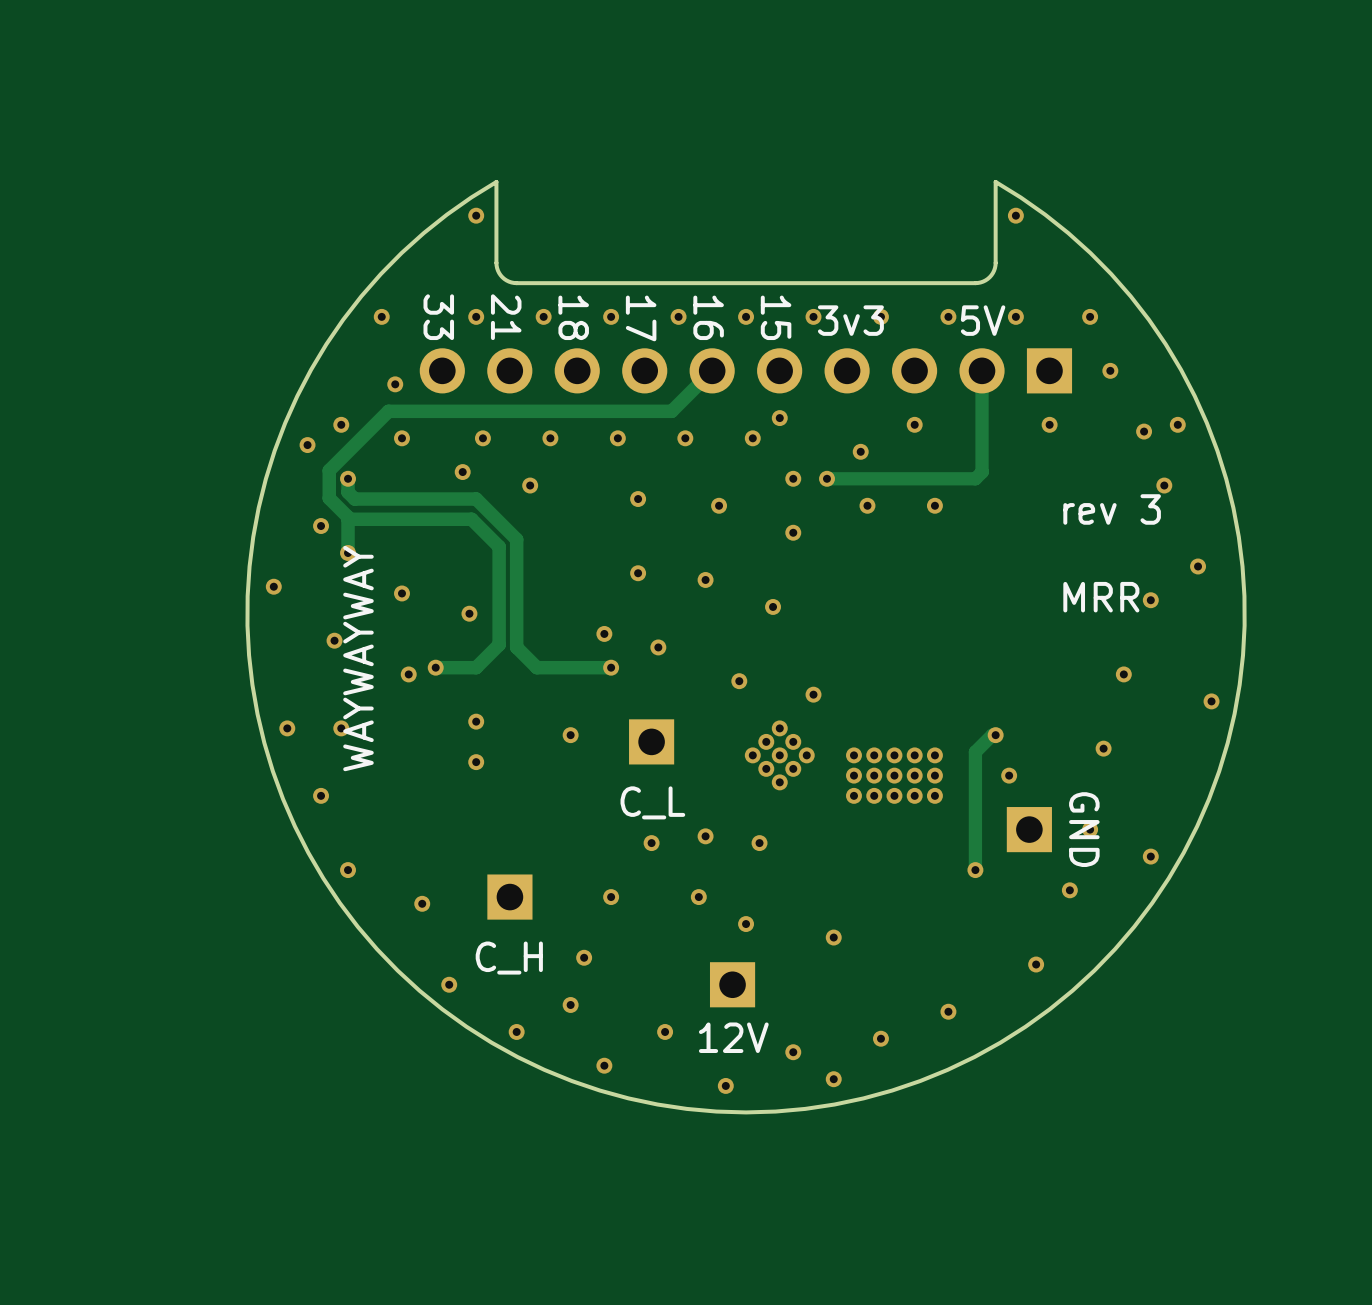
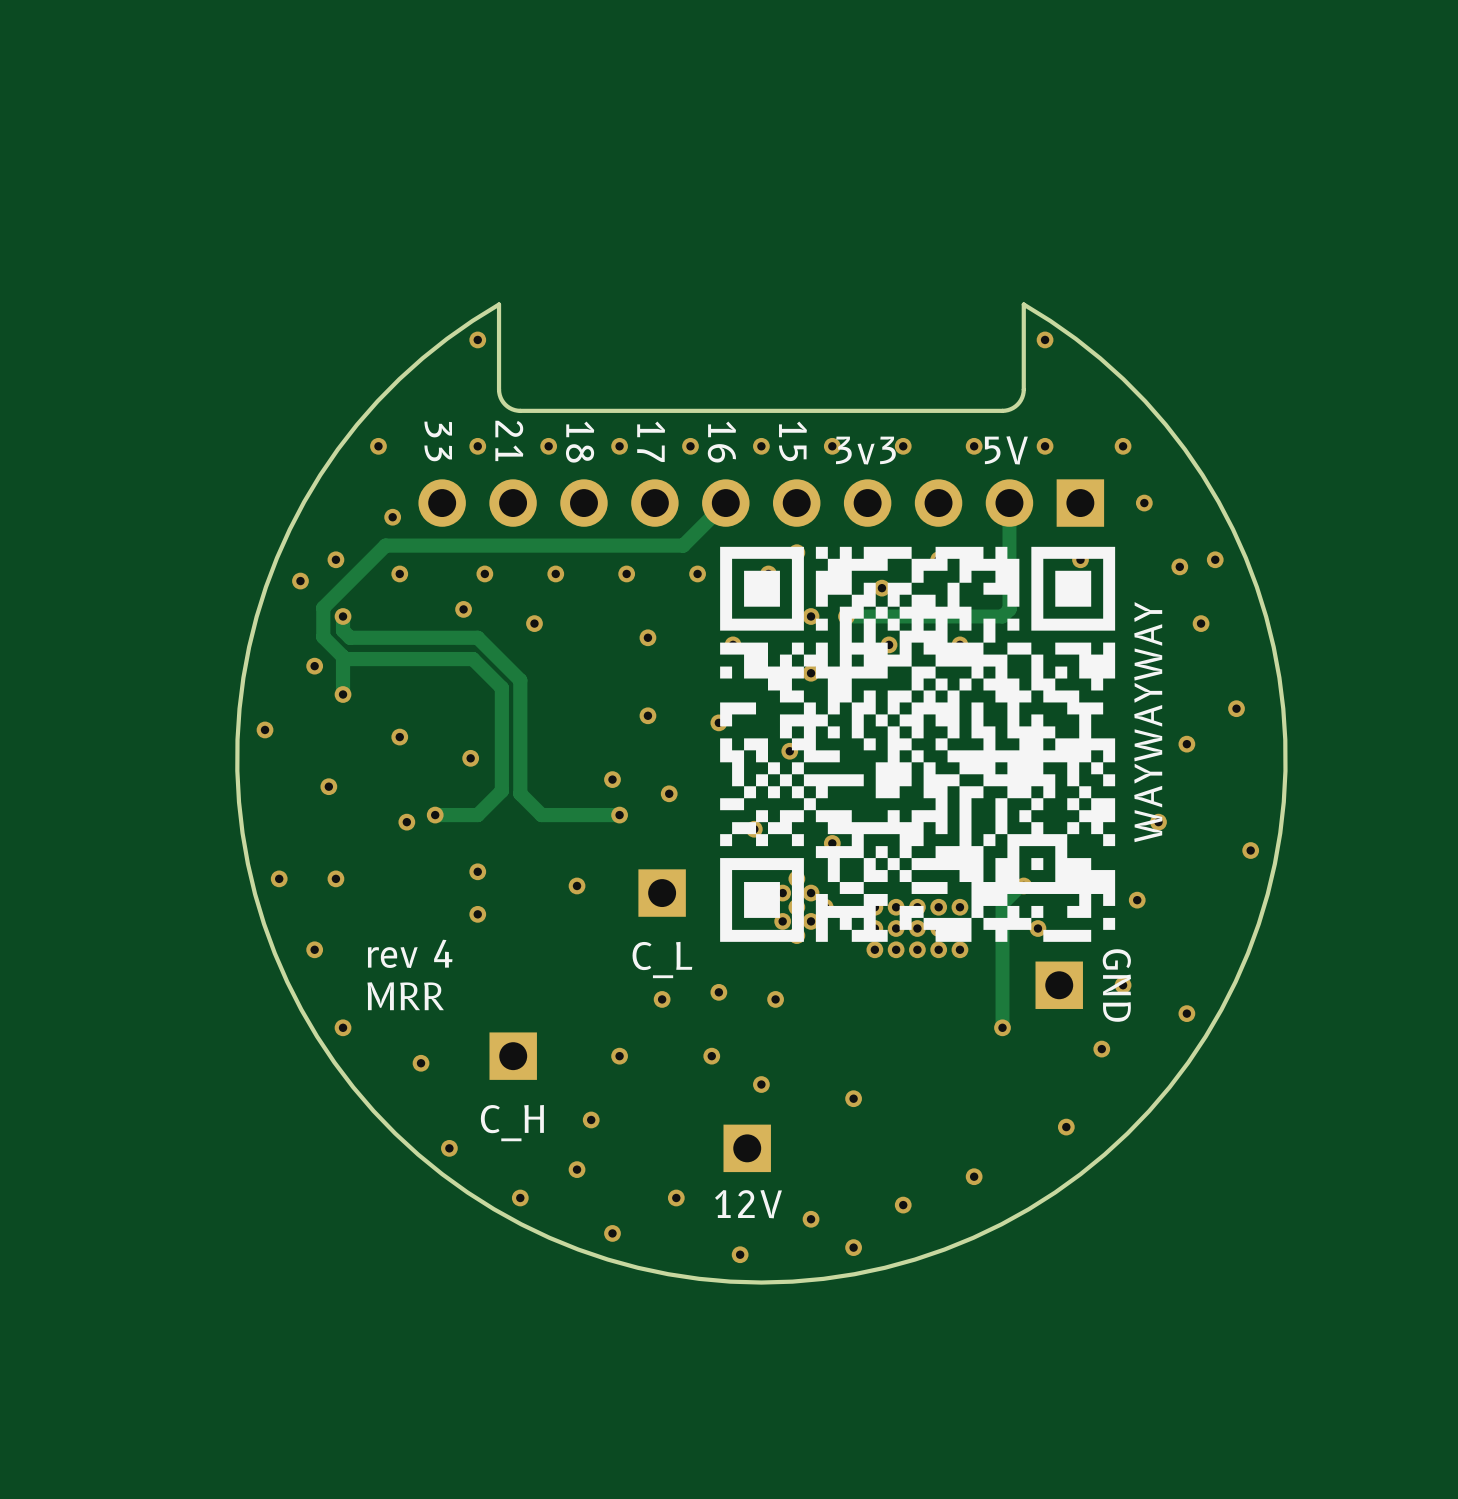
drawing: none -> [720, 546, 1116, 942]
text: rev 3 (1112, 509) -> none
text: none -> WAYWAYWAY (1148, 722)
text: MRR (1101, 597) -> none
text: WAYWAYWAY (358, 658) -> none
text: none -> rev 4 (410, 953)
text: none -> MRR (405, 996)

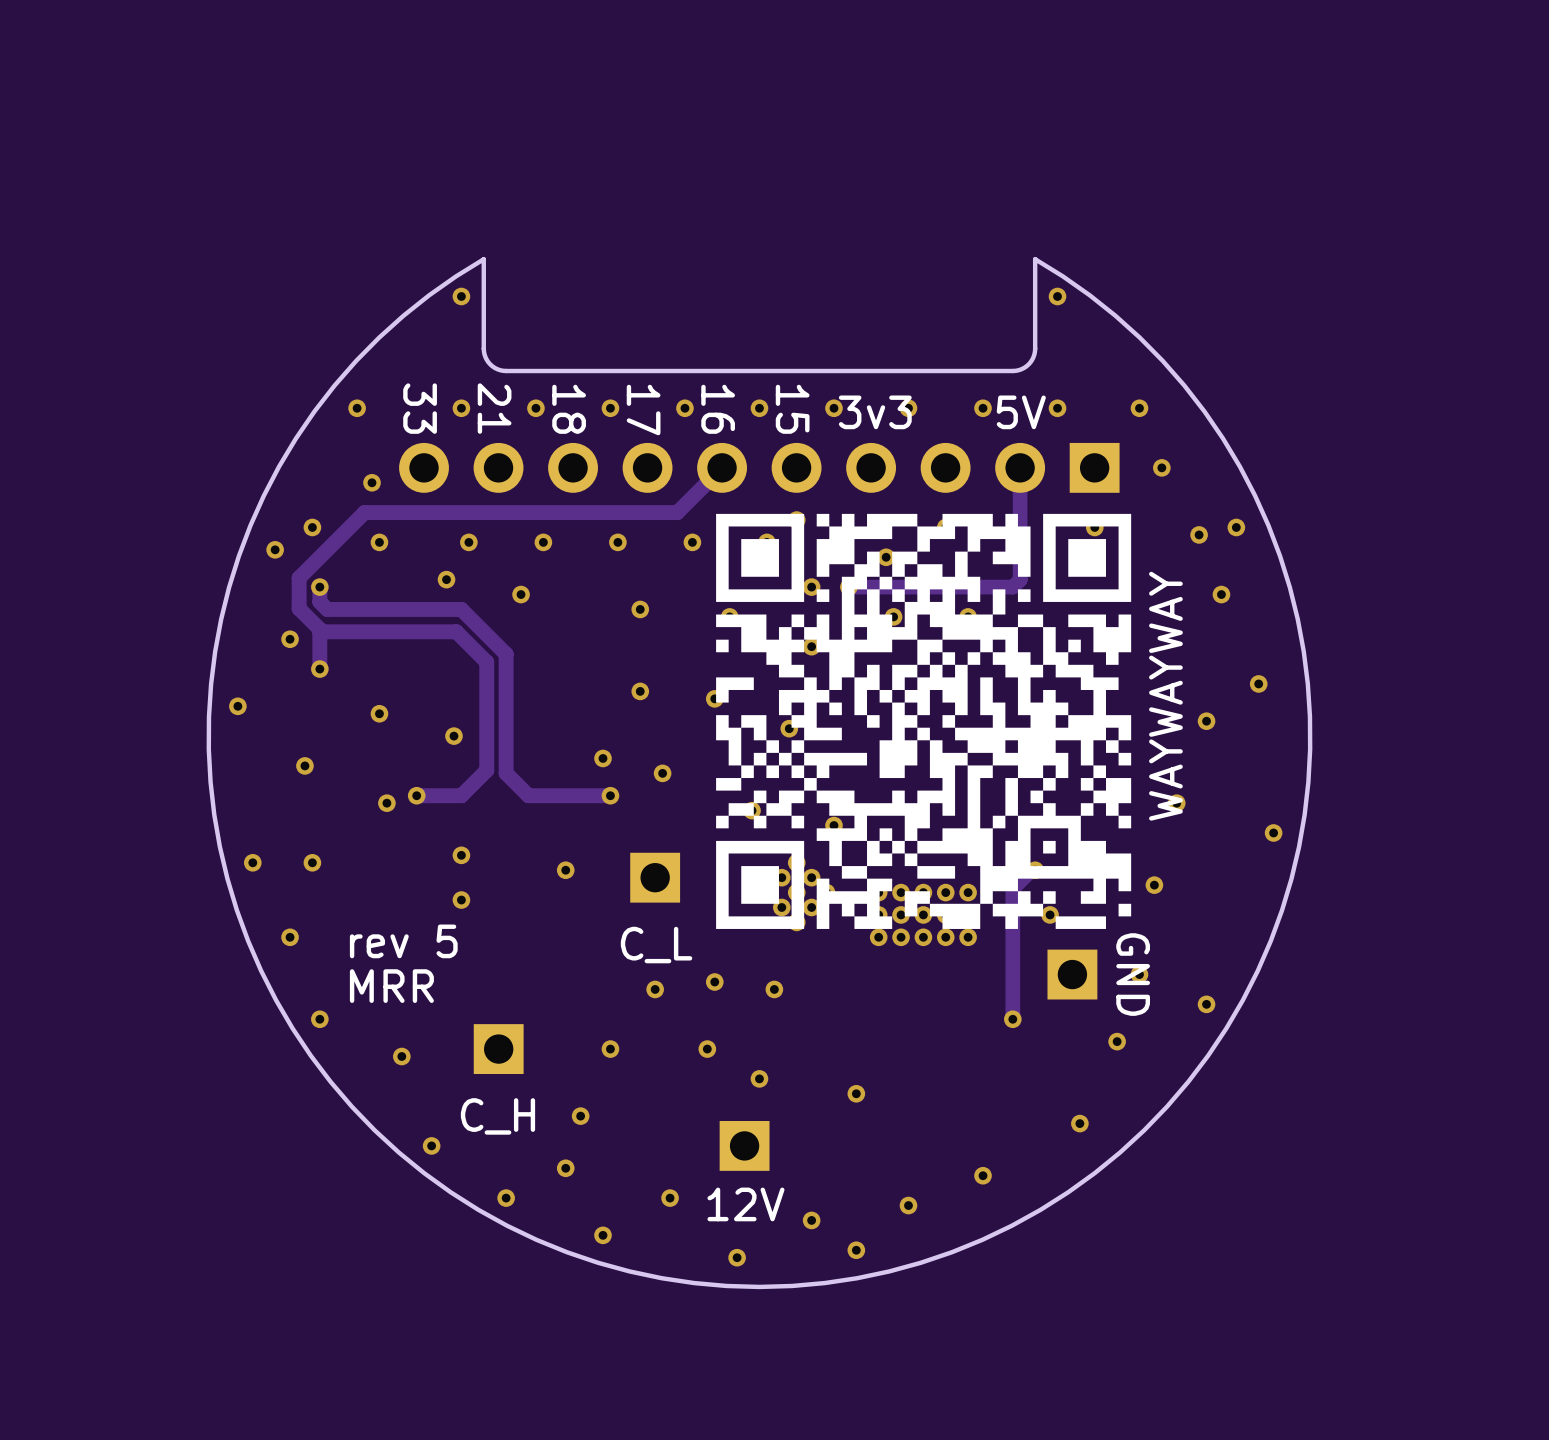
text: rev 4 (410, 953) -> rev 5 (403, 941)

